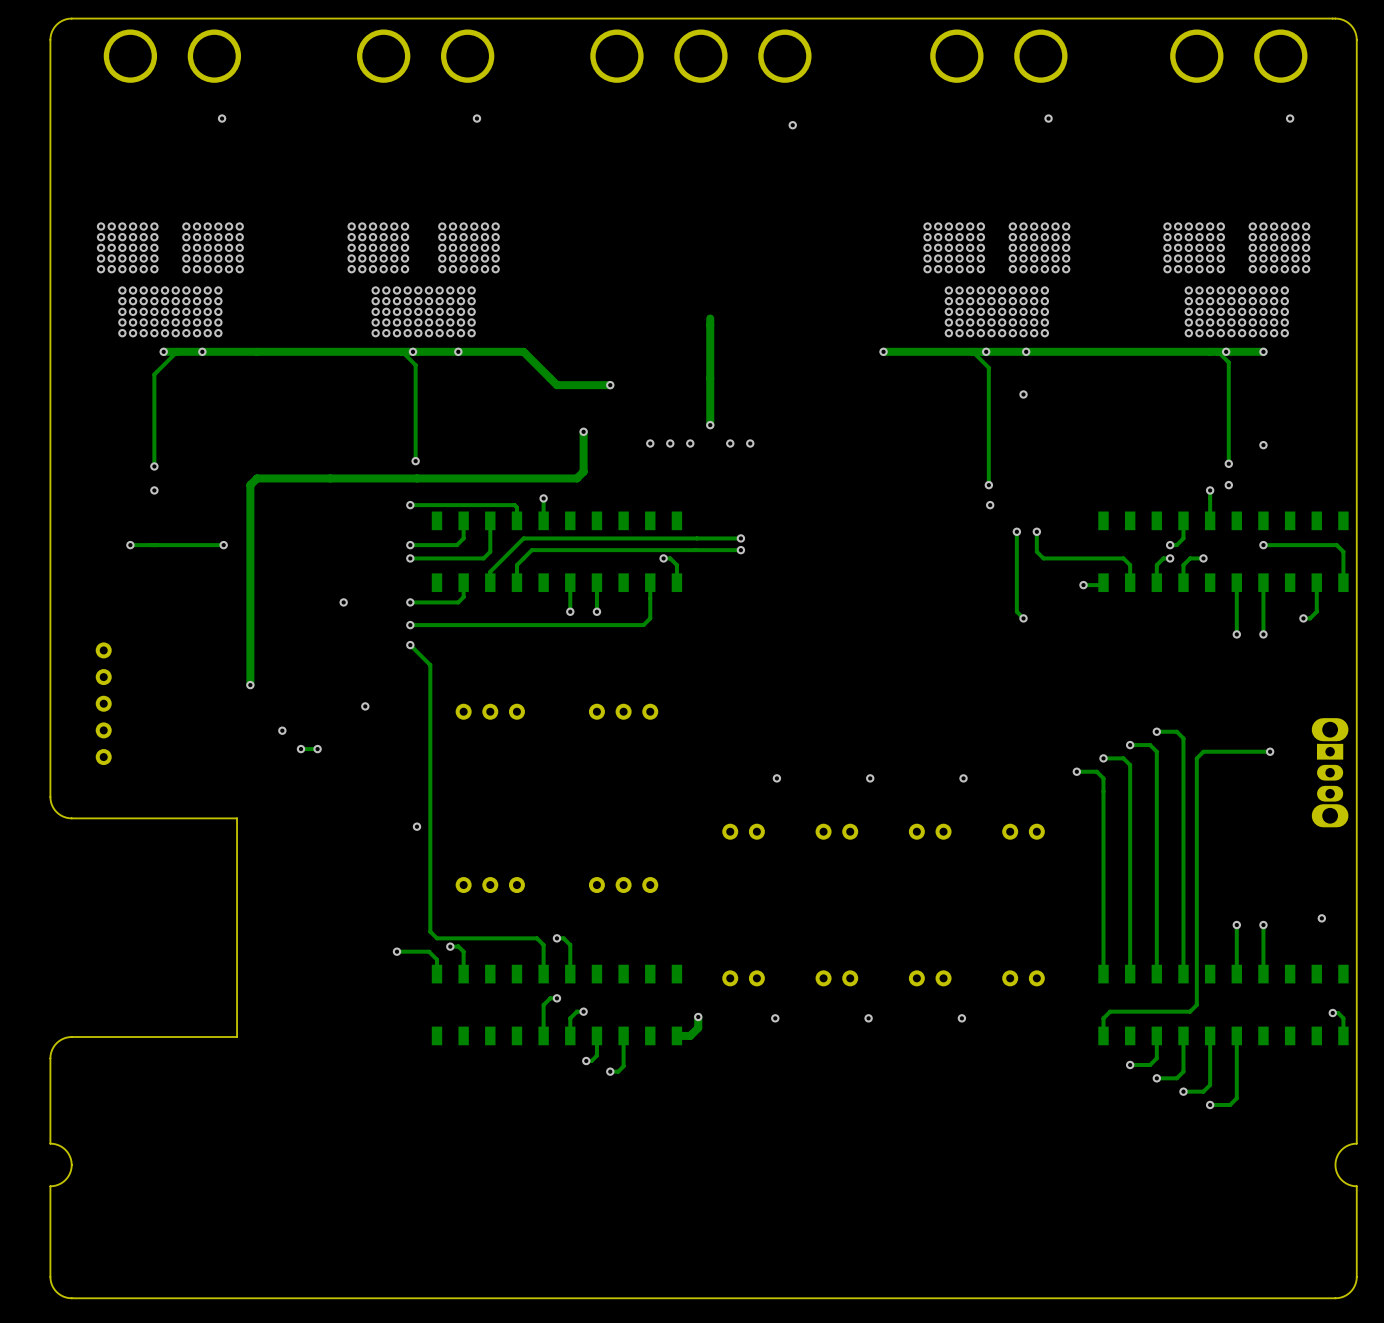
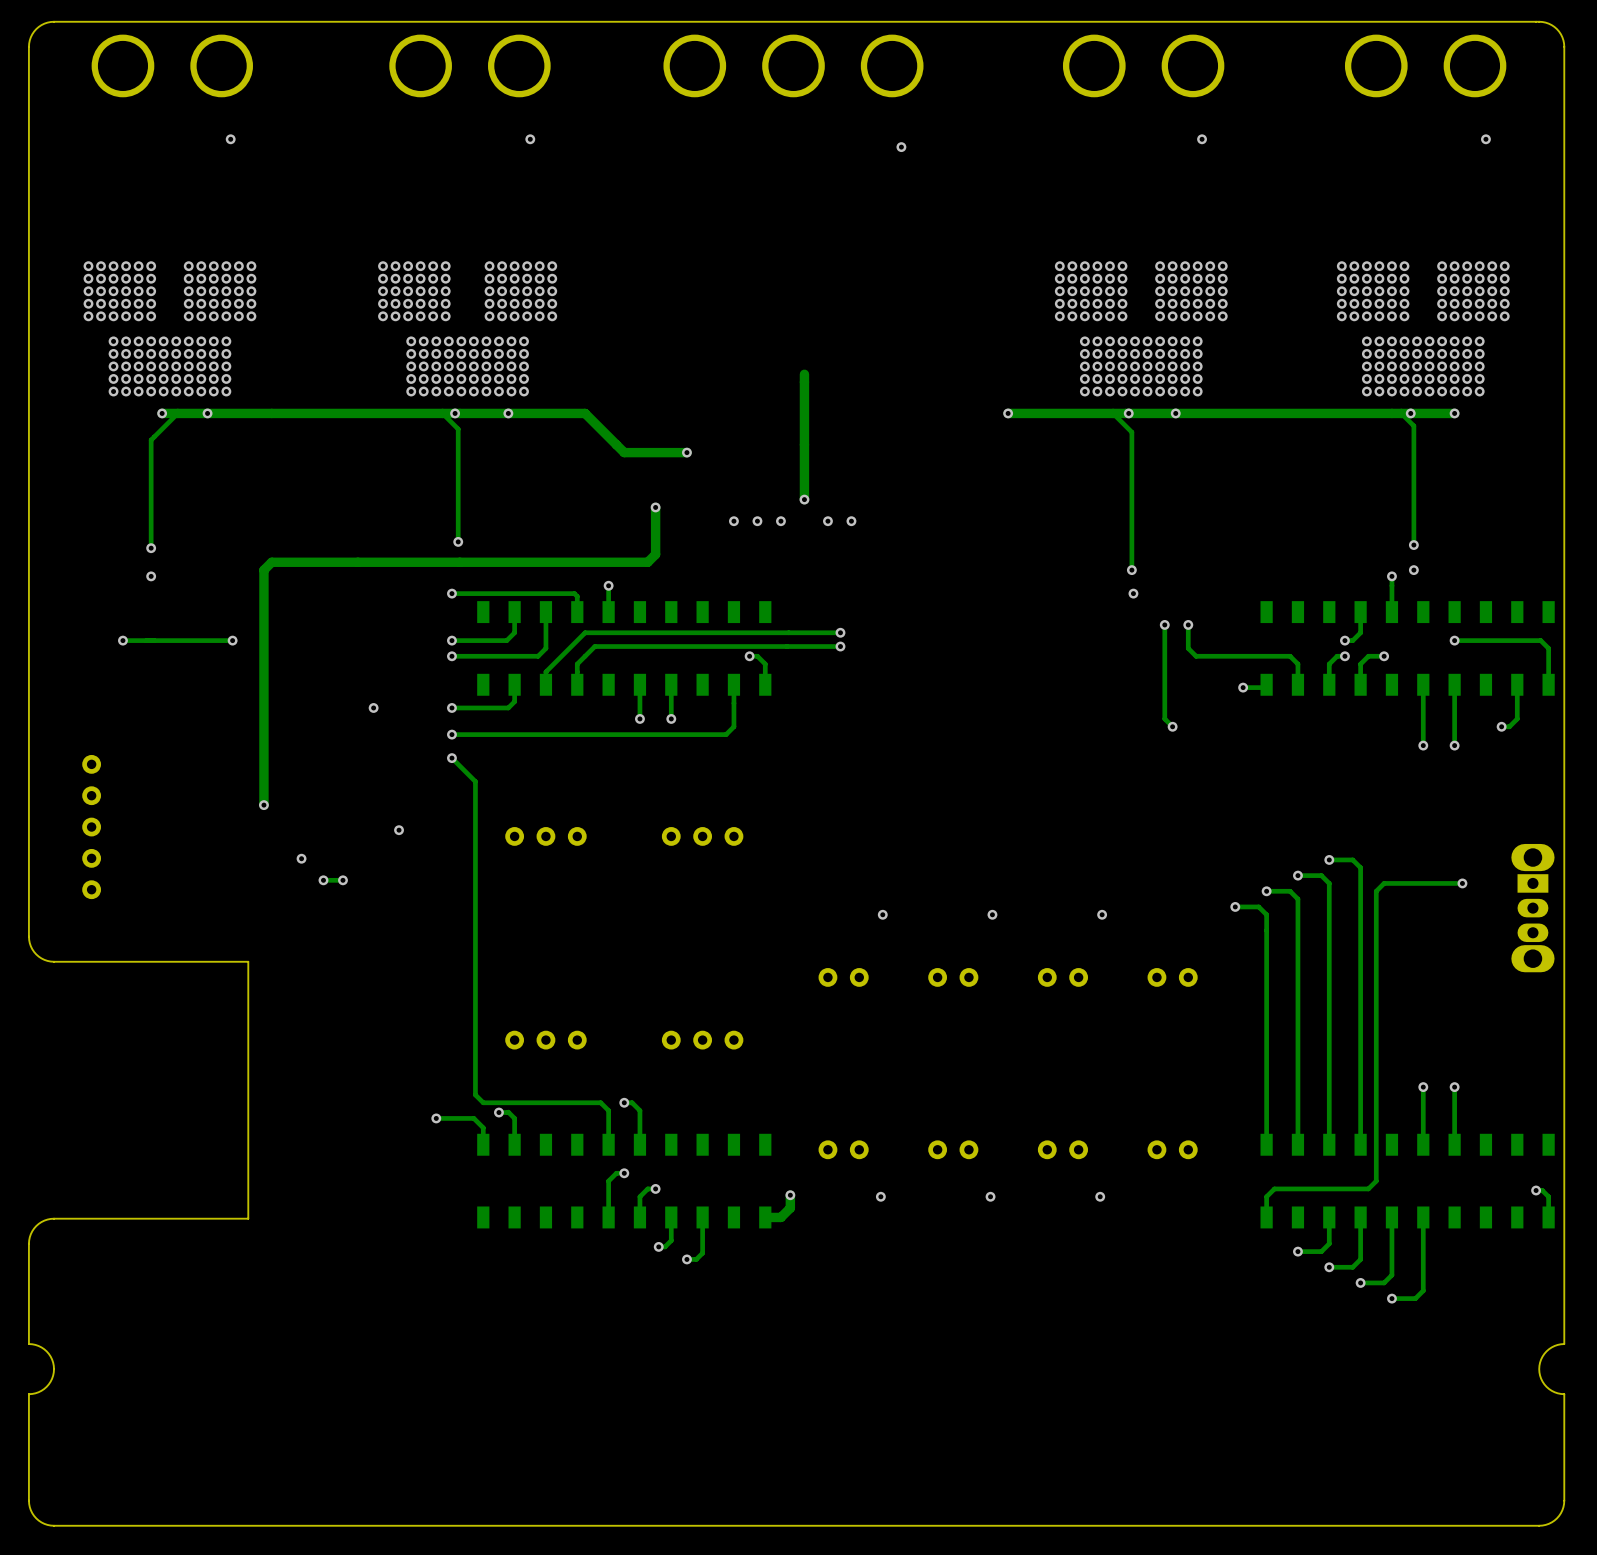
via: (1023, 394) -> none
via: (1263, 445) -> none
via: (416, 826) -> none
via: (1321, 918) -> none

